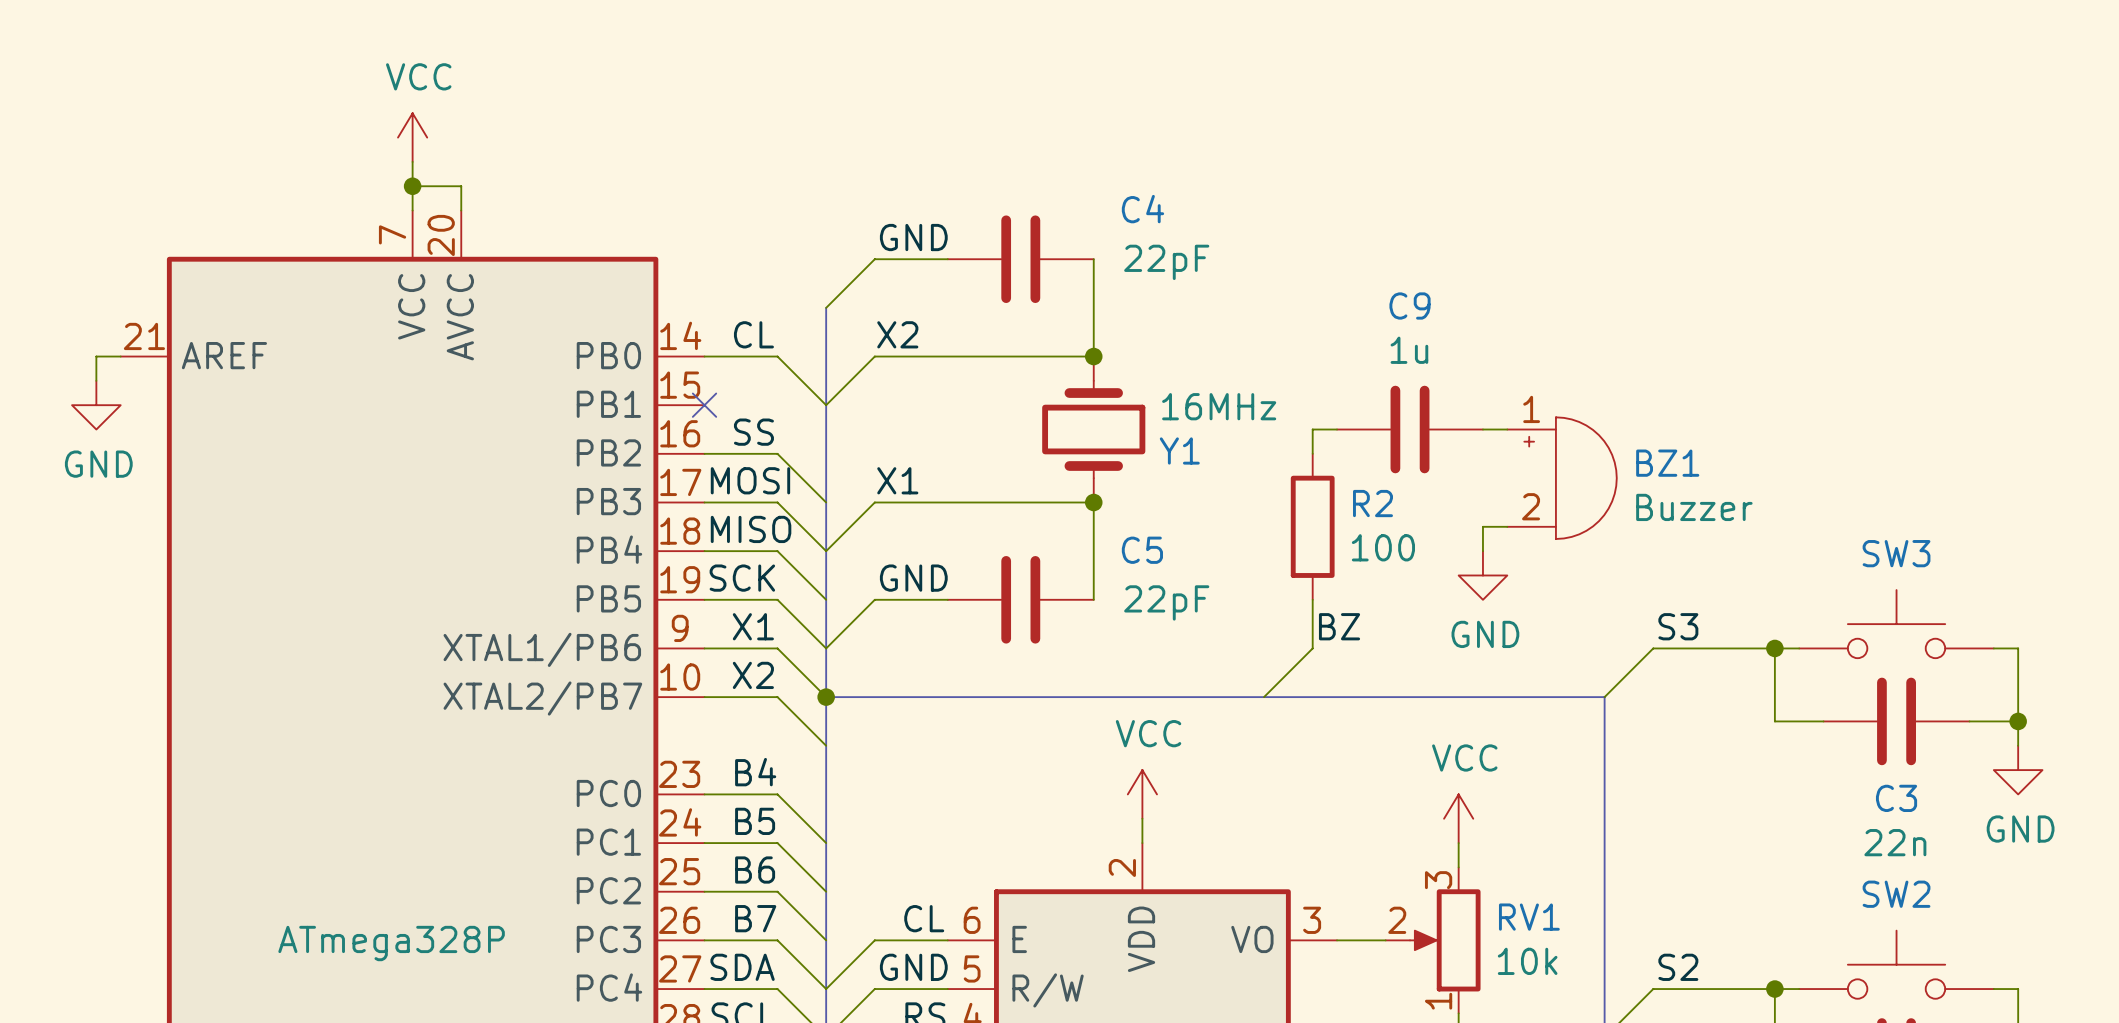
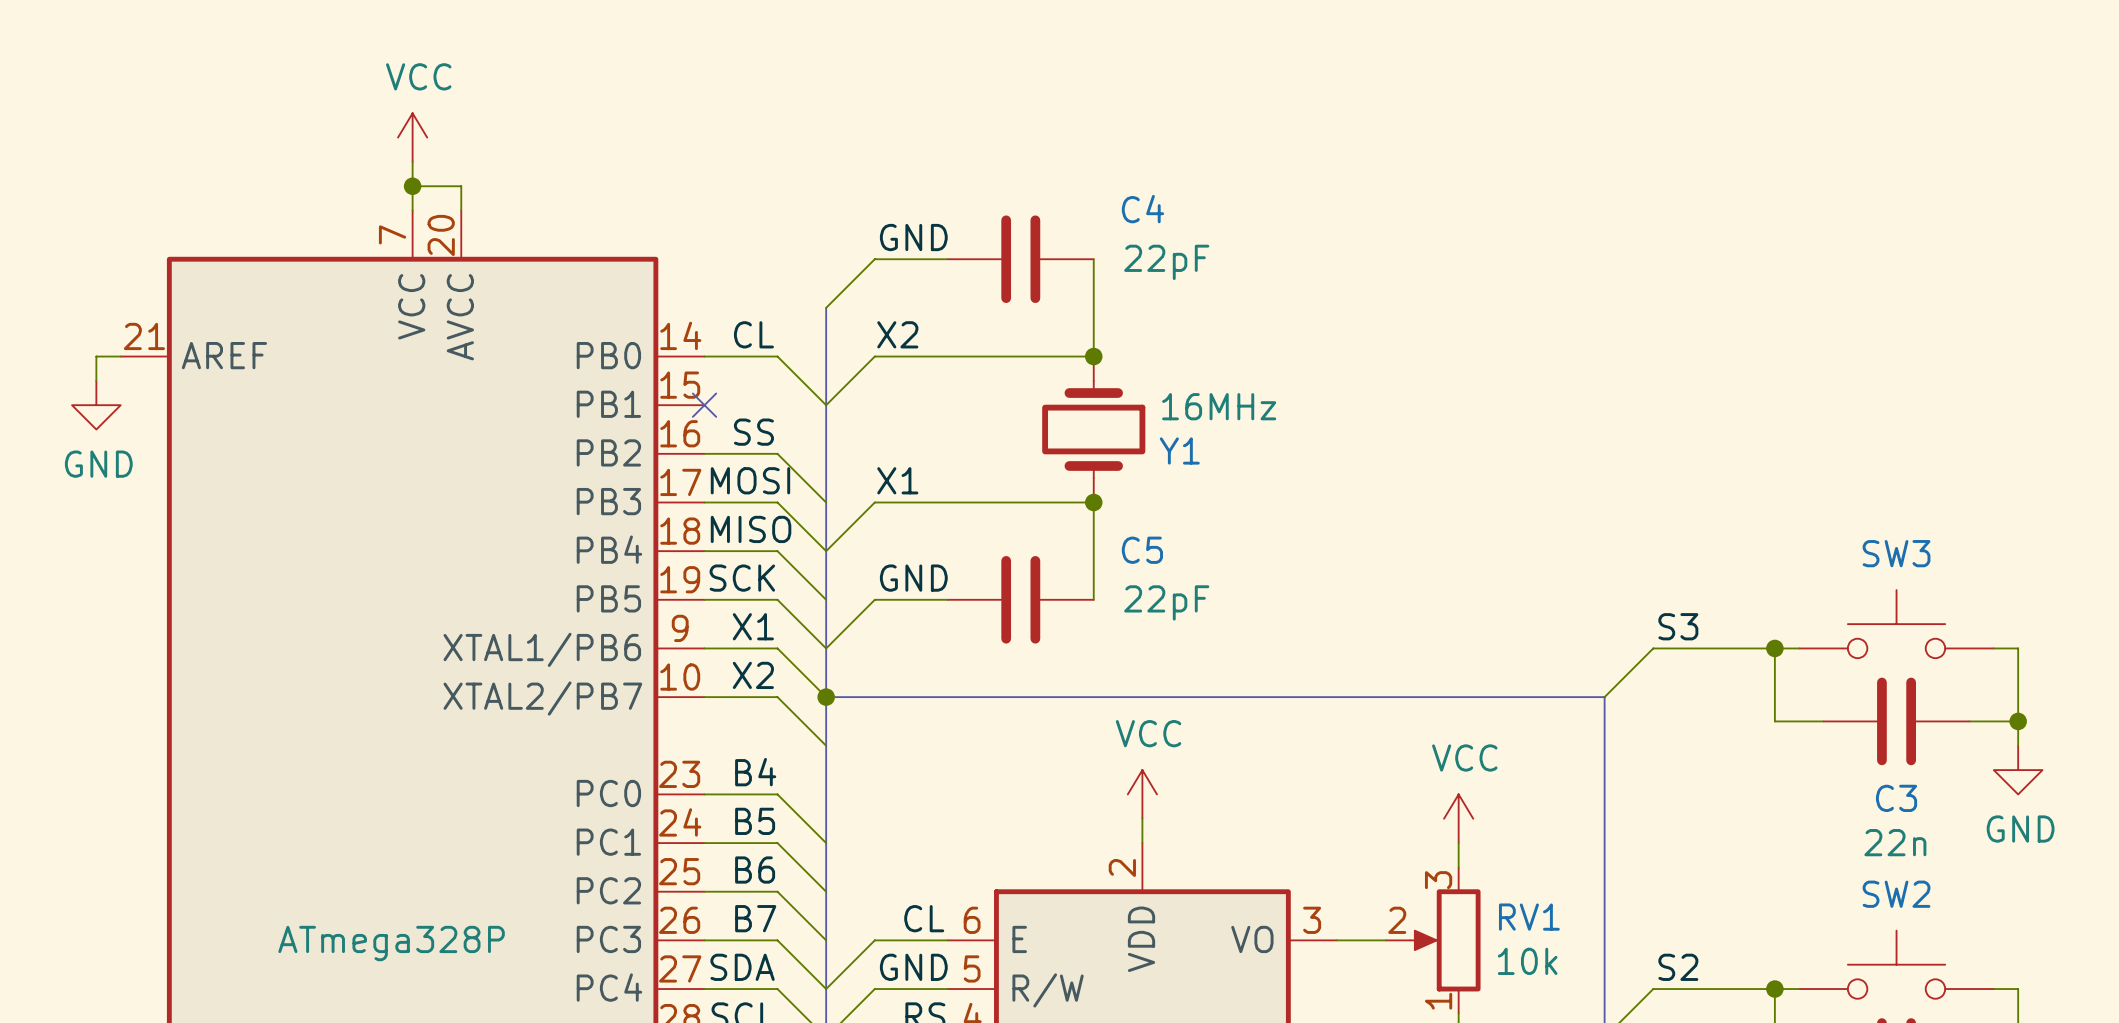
wire: (1337, 429) (1312, 429) (1312, 453) -> none
C9: 1u (1410, 429) -> none
wire: (1482, 429) (1507, 429) -> none
BZ1: Buzzer (1562, 478) -> none
R2: 100 (1312, 526) -> none
wire: (1507, 526) (1482, 526) (1482, 551) -> none
power symbol: GND (1482, 575) -> none
wire: (1312, 599) (1312, 648) (1264, 697) -> none
label: BZ (1339, 626) -> none

